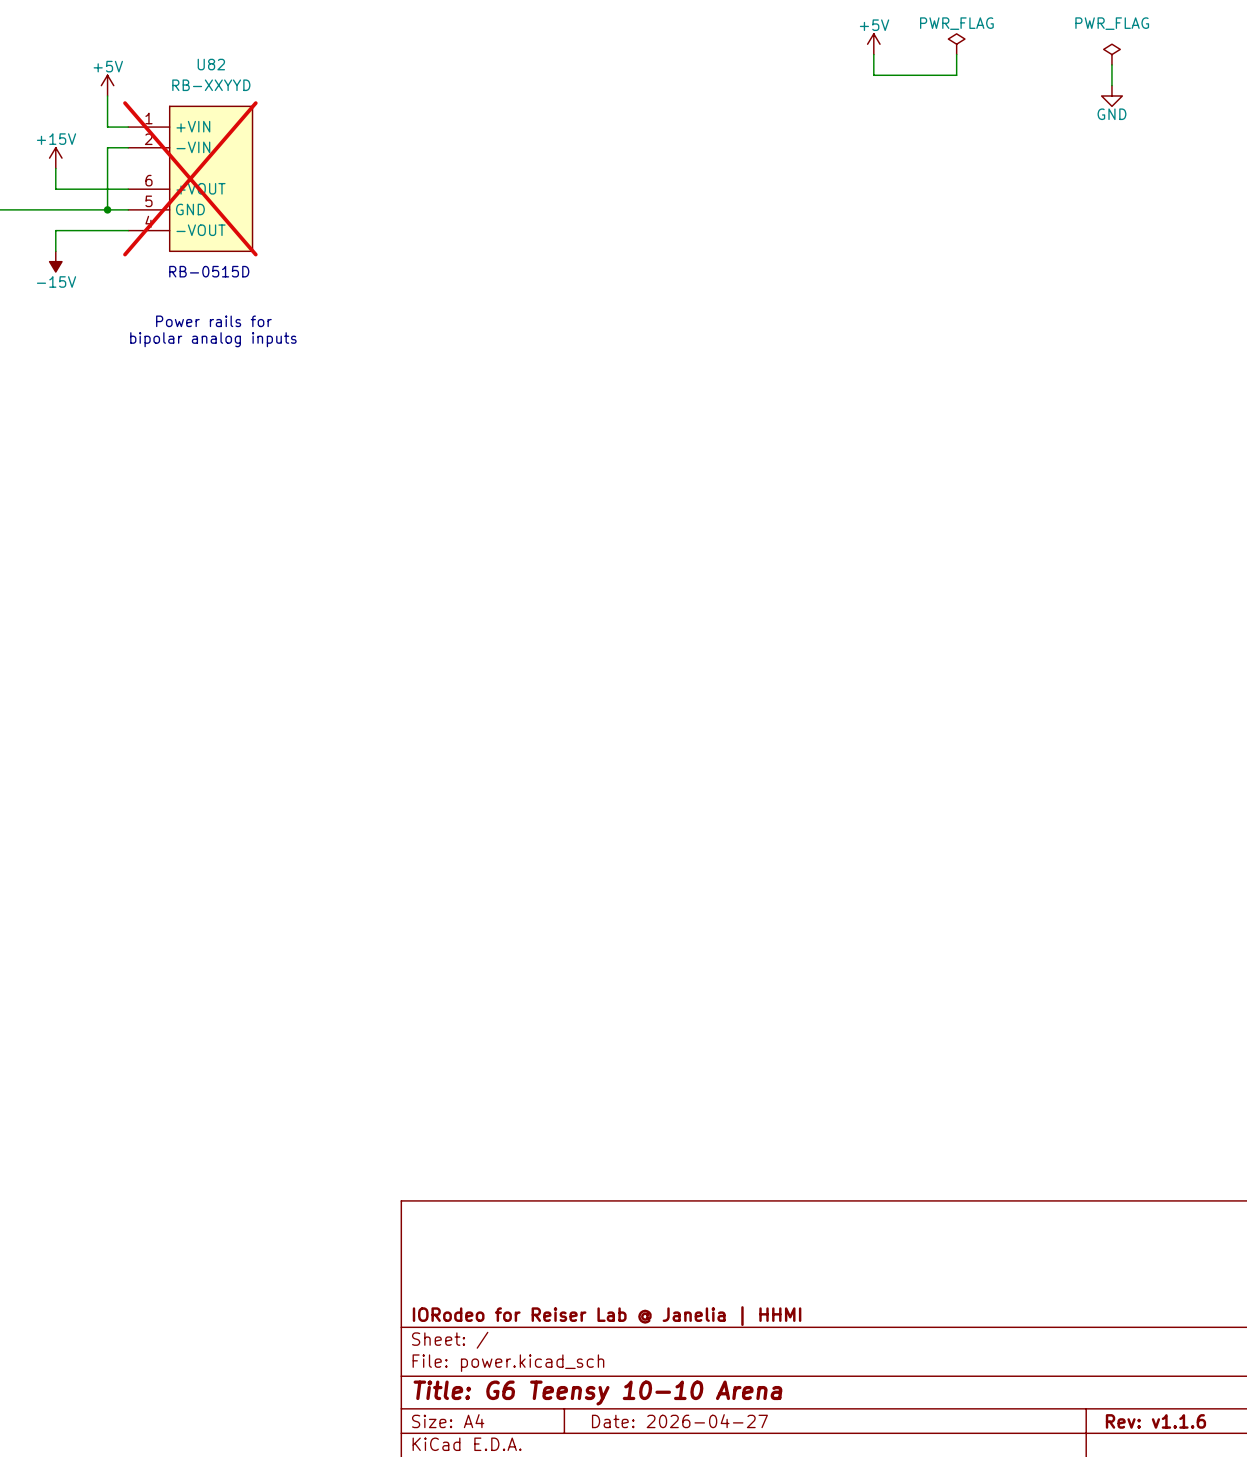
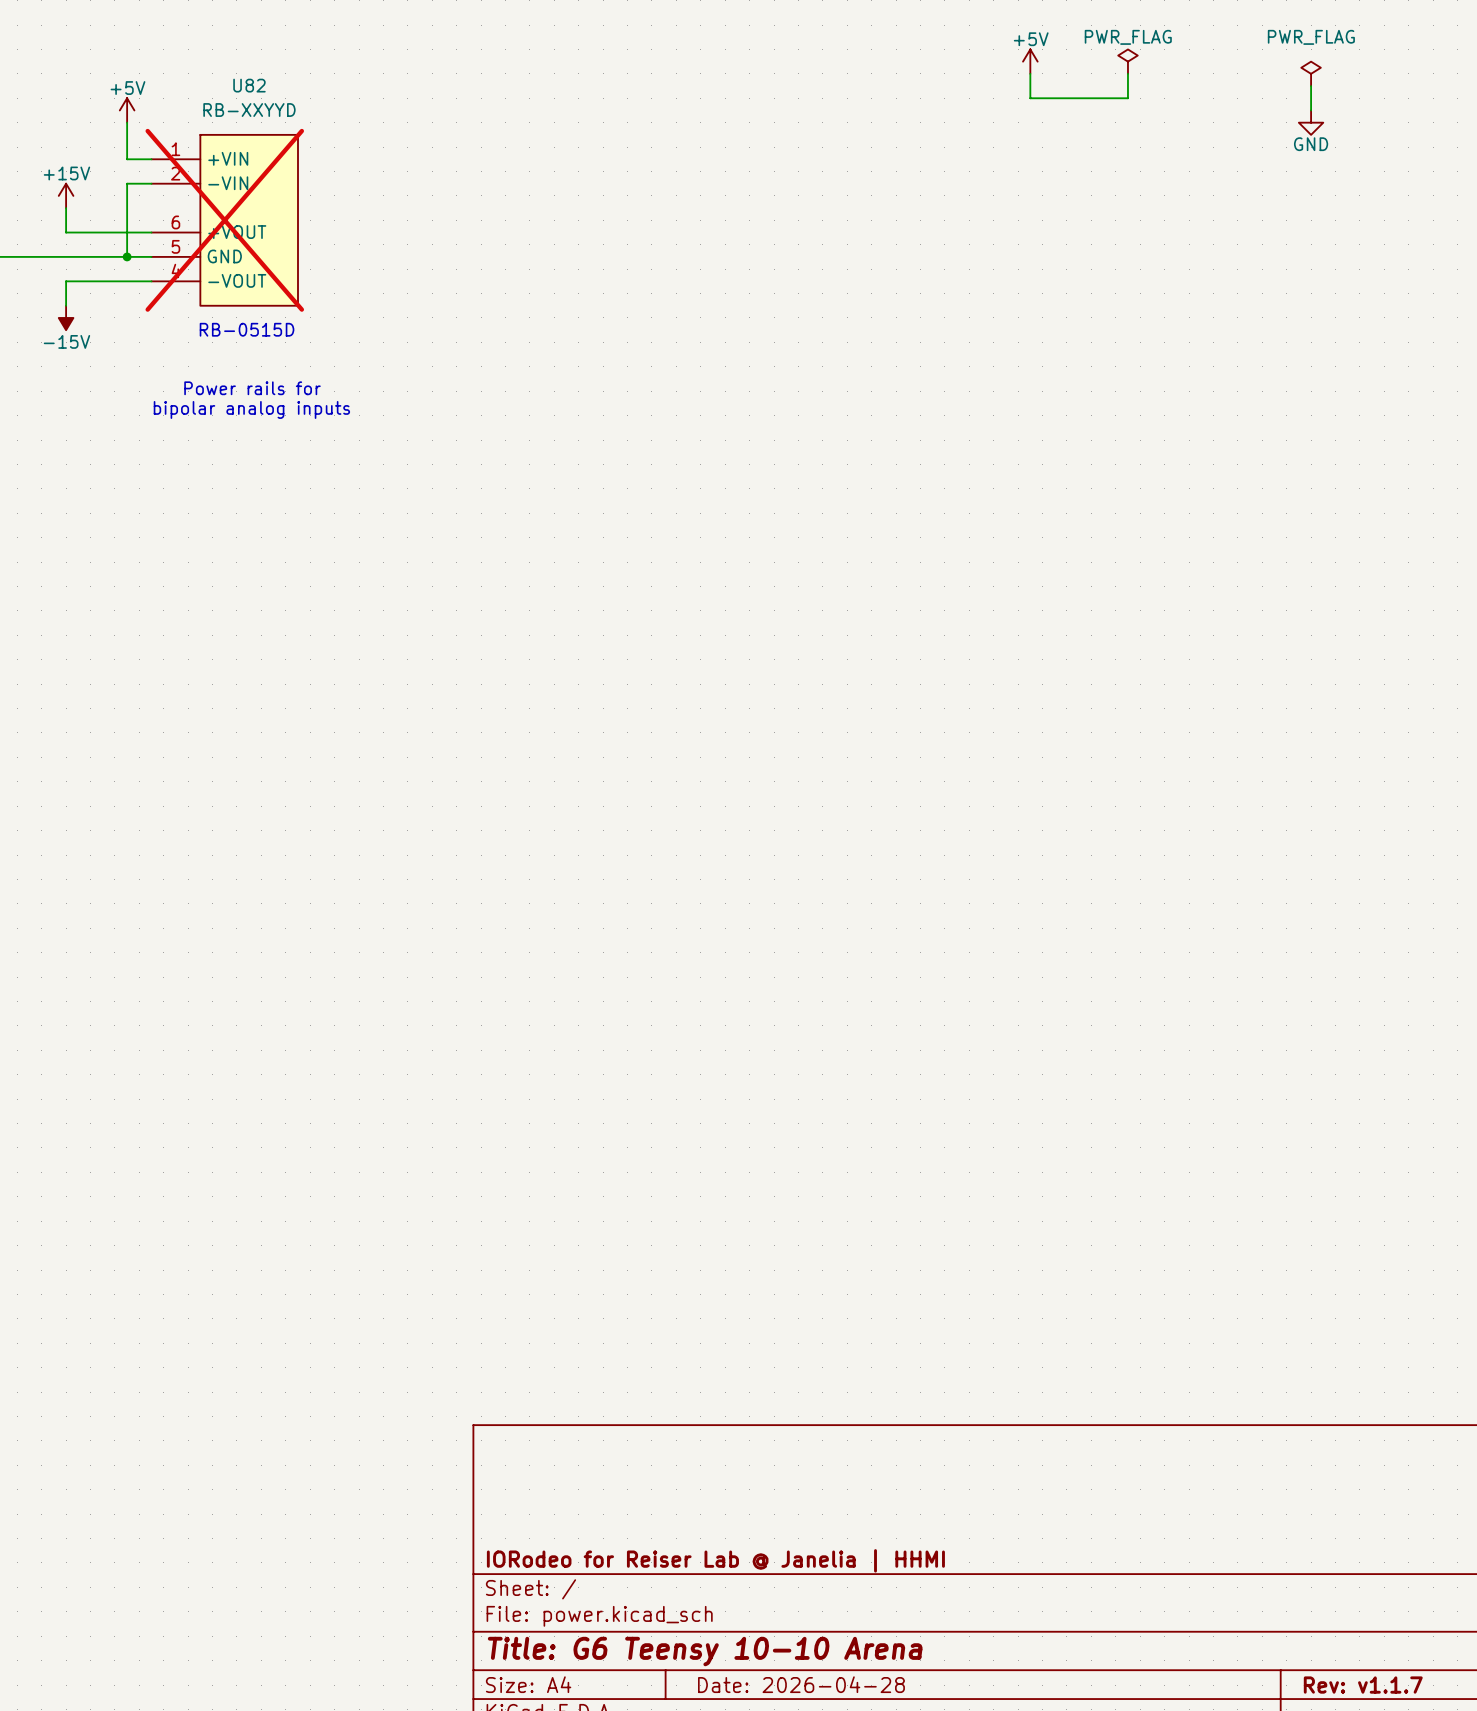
title block: Date: 2026-04-27 (679, 1421) -> Date: 2026-04-28 (801, 1684)
title block: Rev: v1.1.6 (1155, 1421) -> Rev: v1.1.7 (1363, 1685)

